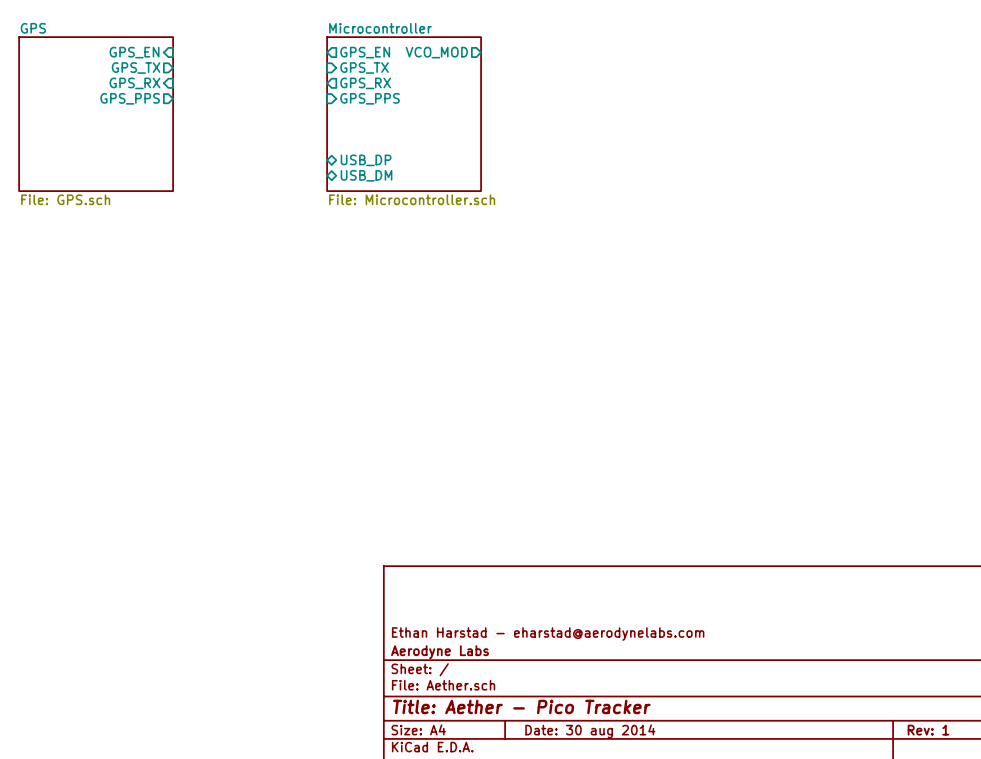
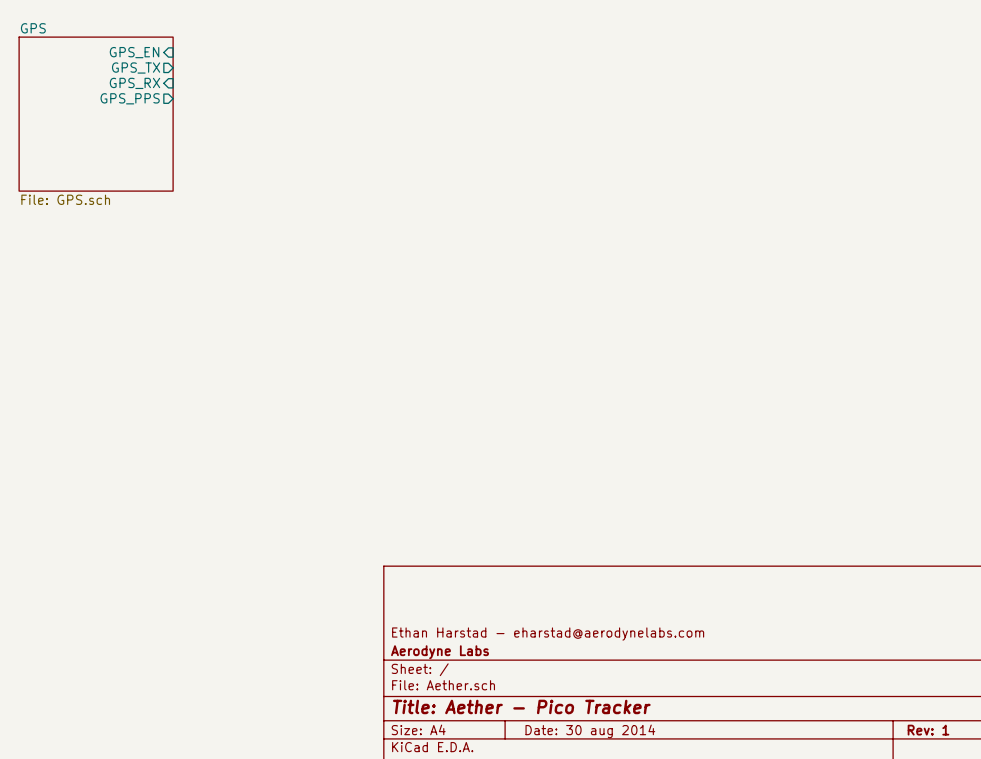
sheet pin: GPS_EN (365, 52) -> none
sheet pin: VCO_MOD (436, 52) -> none
sheet pin: GPS_TX (364, 68) -> none
sheet pin: GPS_RX (365, 83) -> none
sheet pin: GPS_PPS (370, 98) -> none
sheet Microcontroller: File: Microcontroller.sch (404, 114) -> none
sheet pin: USB_DP (366, 160) -> none
sheet pin: USB_DM (366, 175) -> none

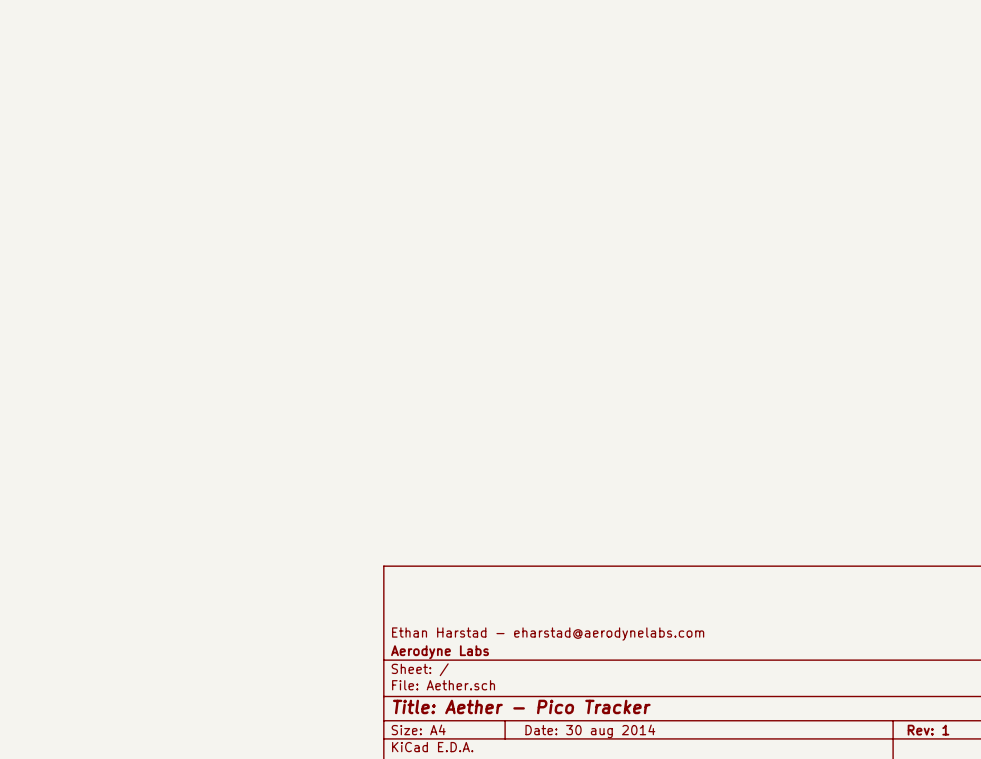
sheet pin: GPS_EN (134, 52) -> none
sheet pin: GPS_TX (136, 68) -> none
sheet pin: GPS_RX (134, 83) -> none
sheet pin: GPS_PPS (130, 98) -> none
sheet GPS: File: GPS.sch (96, 114) -> none

